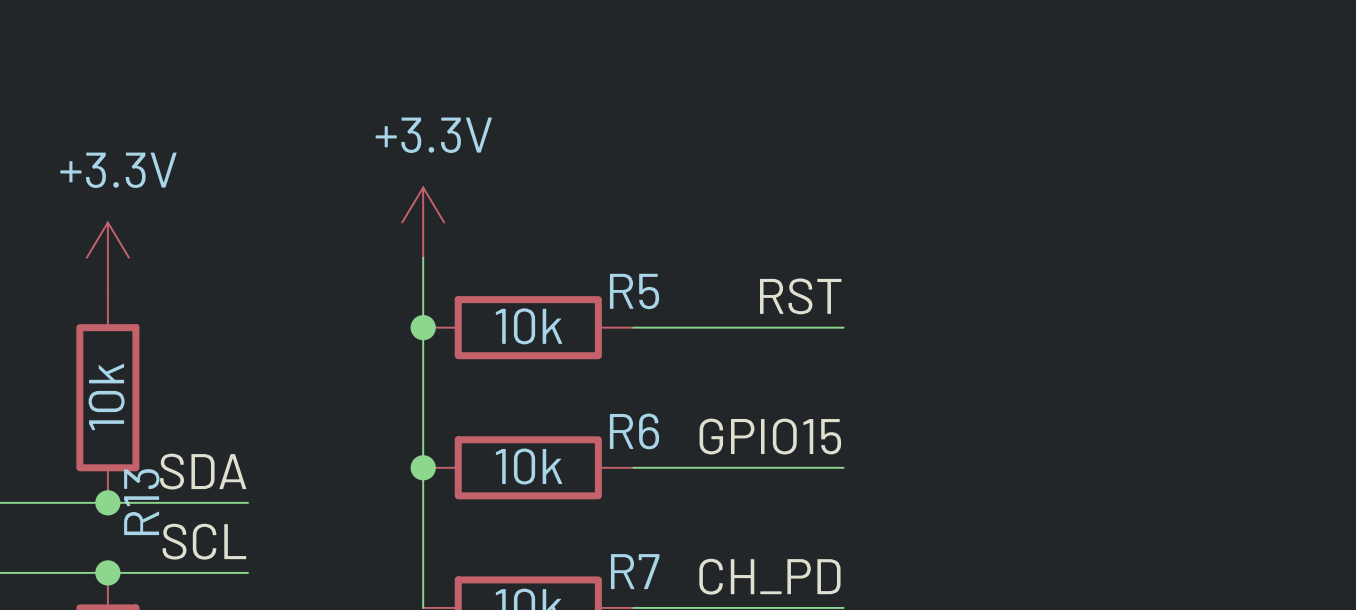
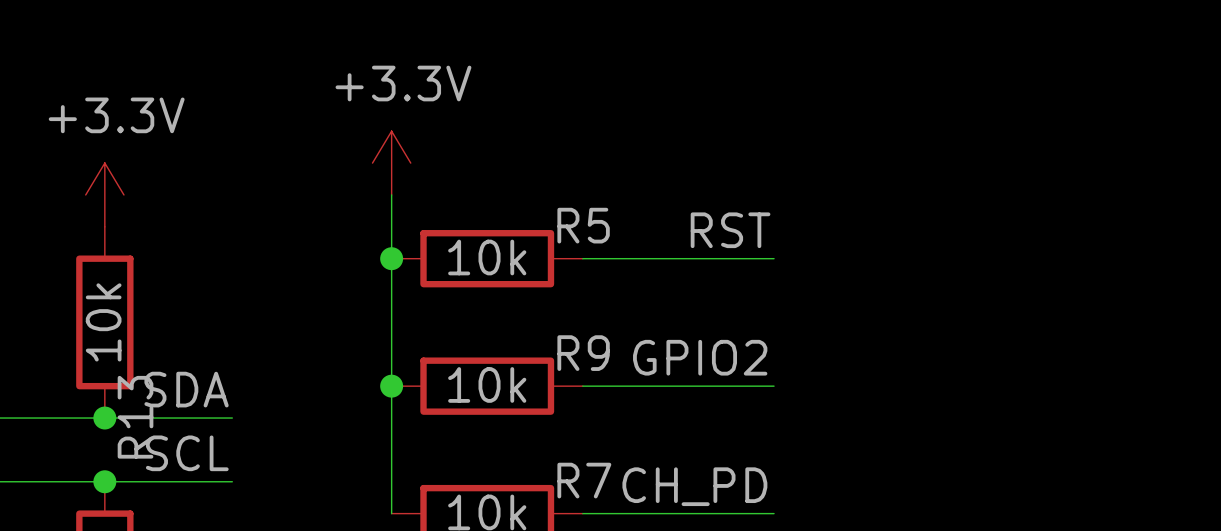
R6 name: R6 (634, 431) -> R9 (583, 353)
label: GPIO15 (770, 436) -> GPIO2 (700, 357)

